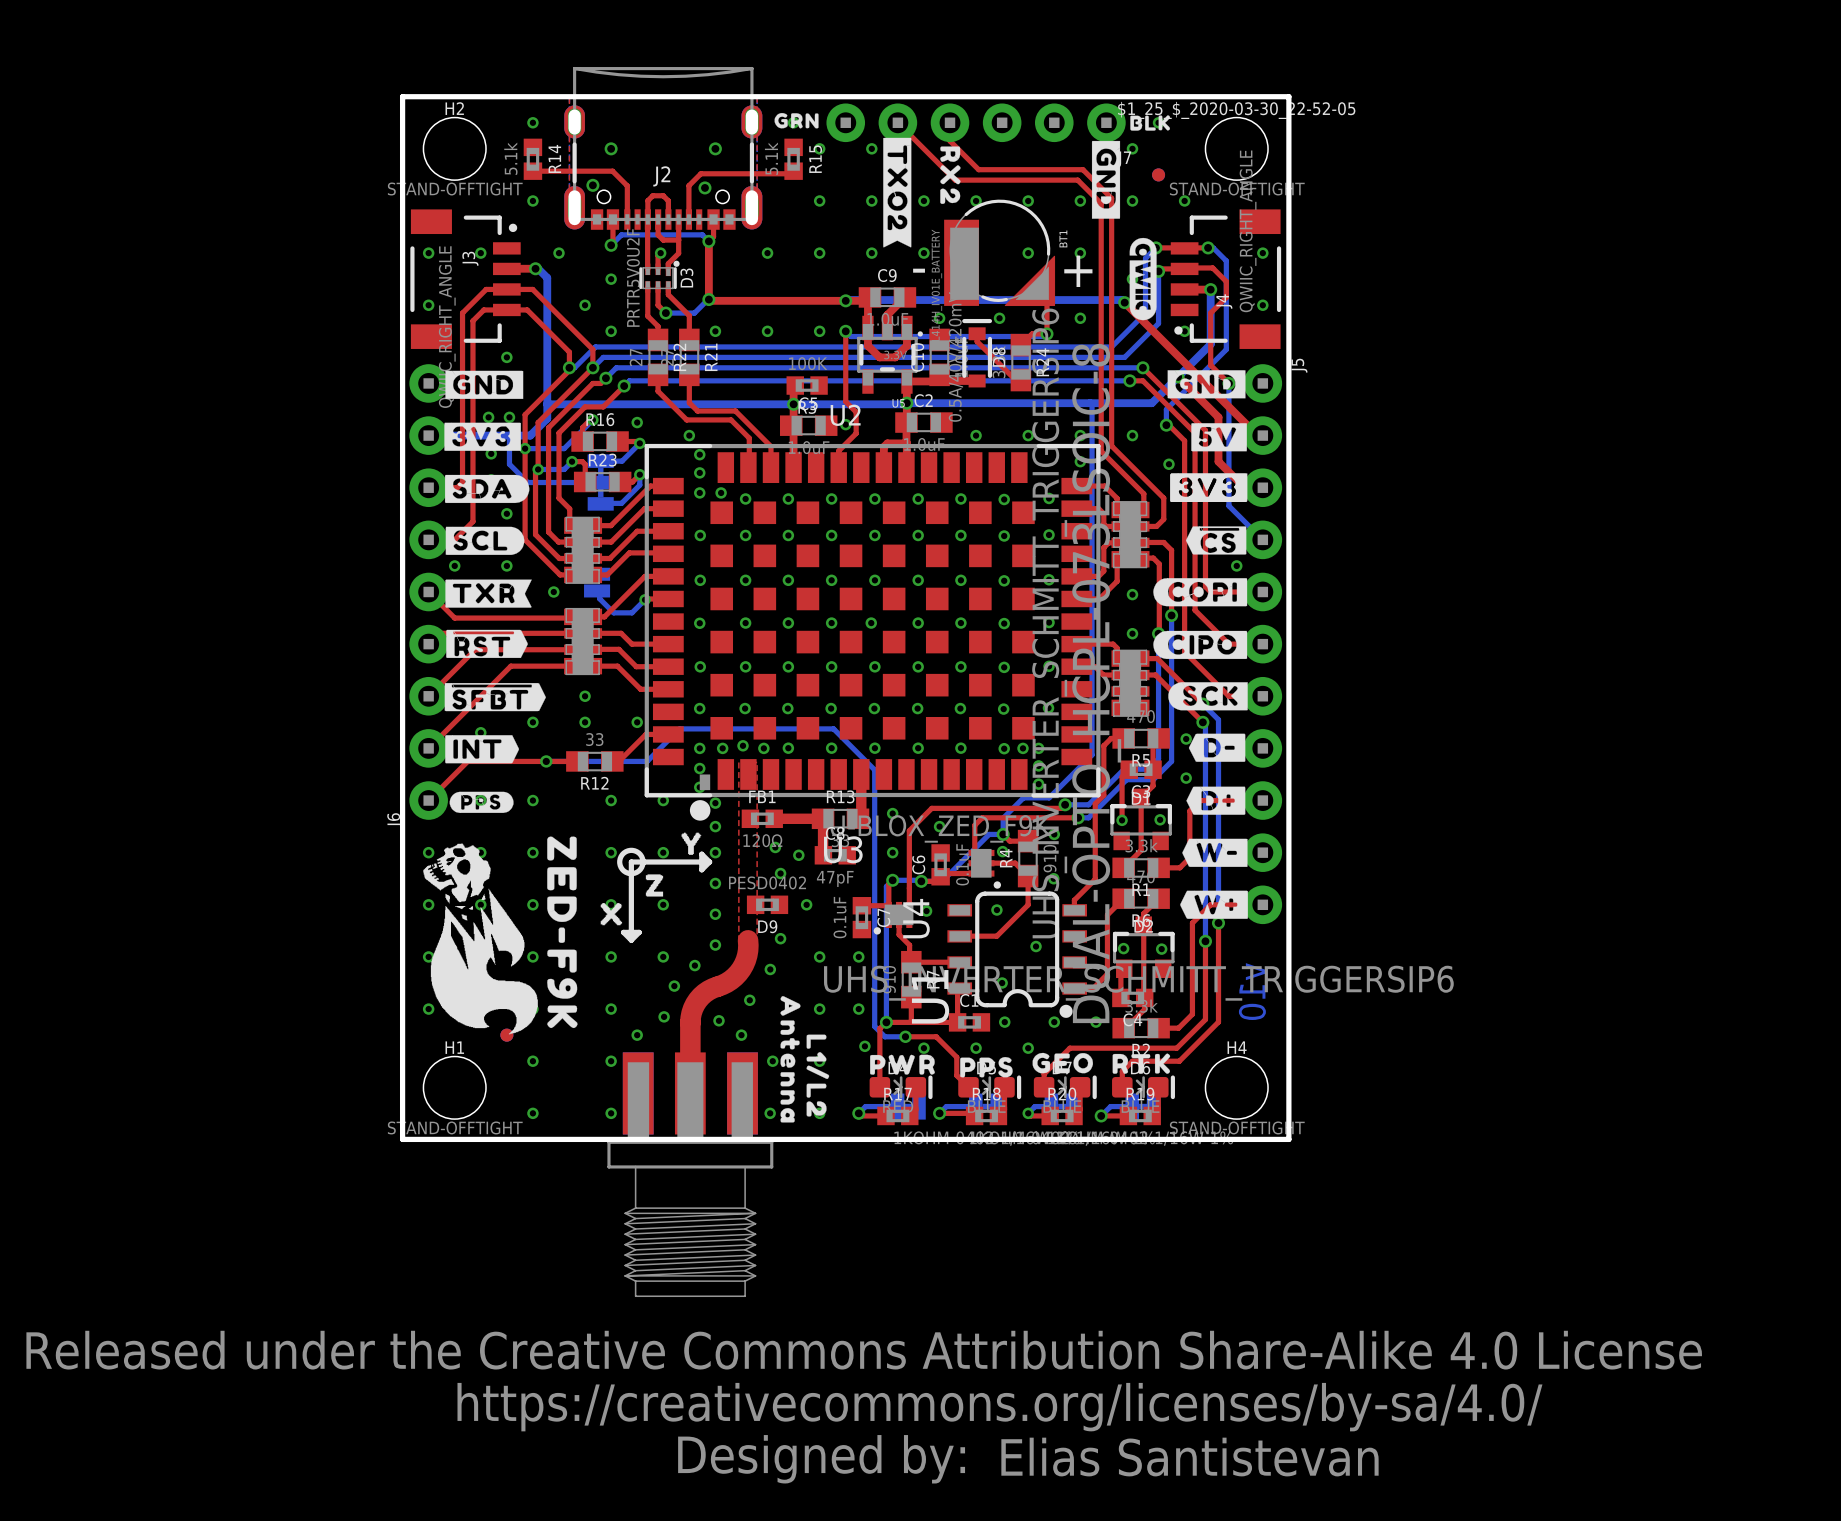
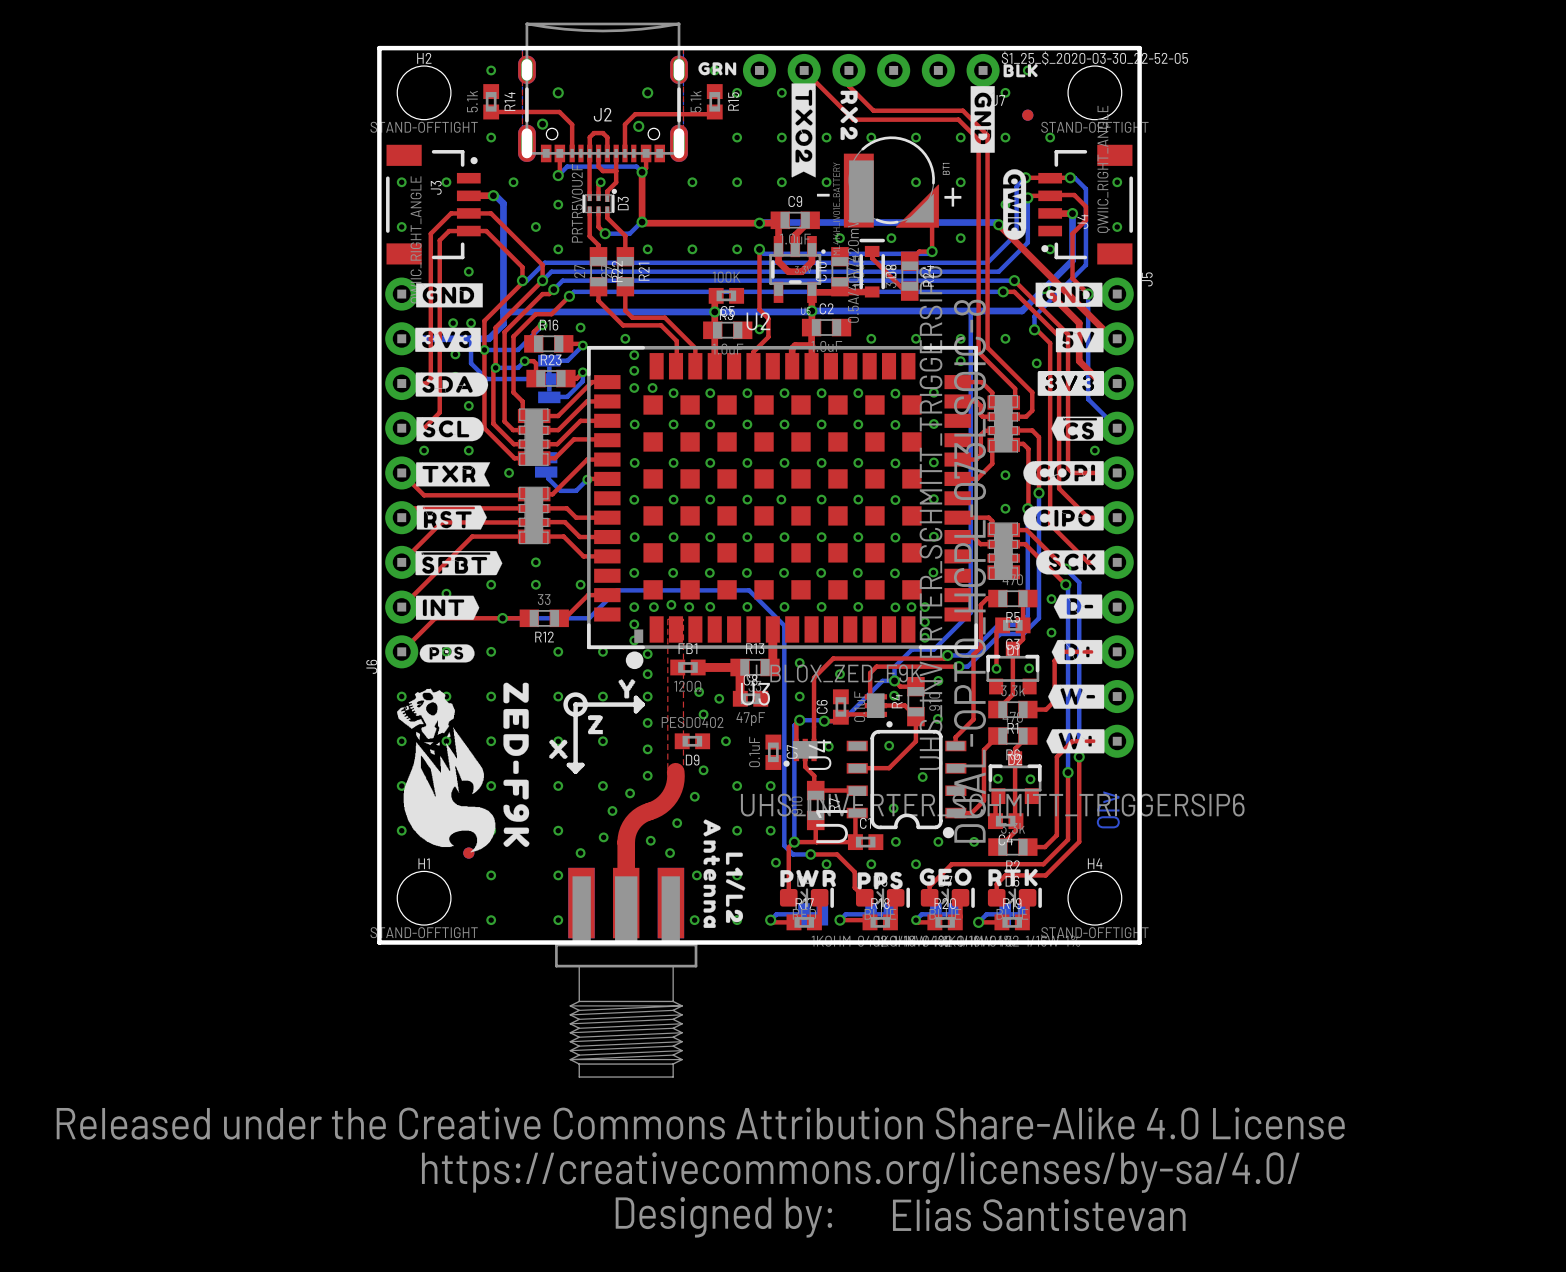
top track: (861, 905) (888, 907) -> none

